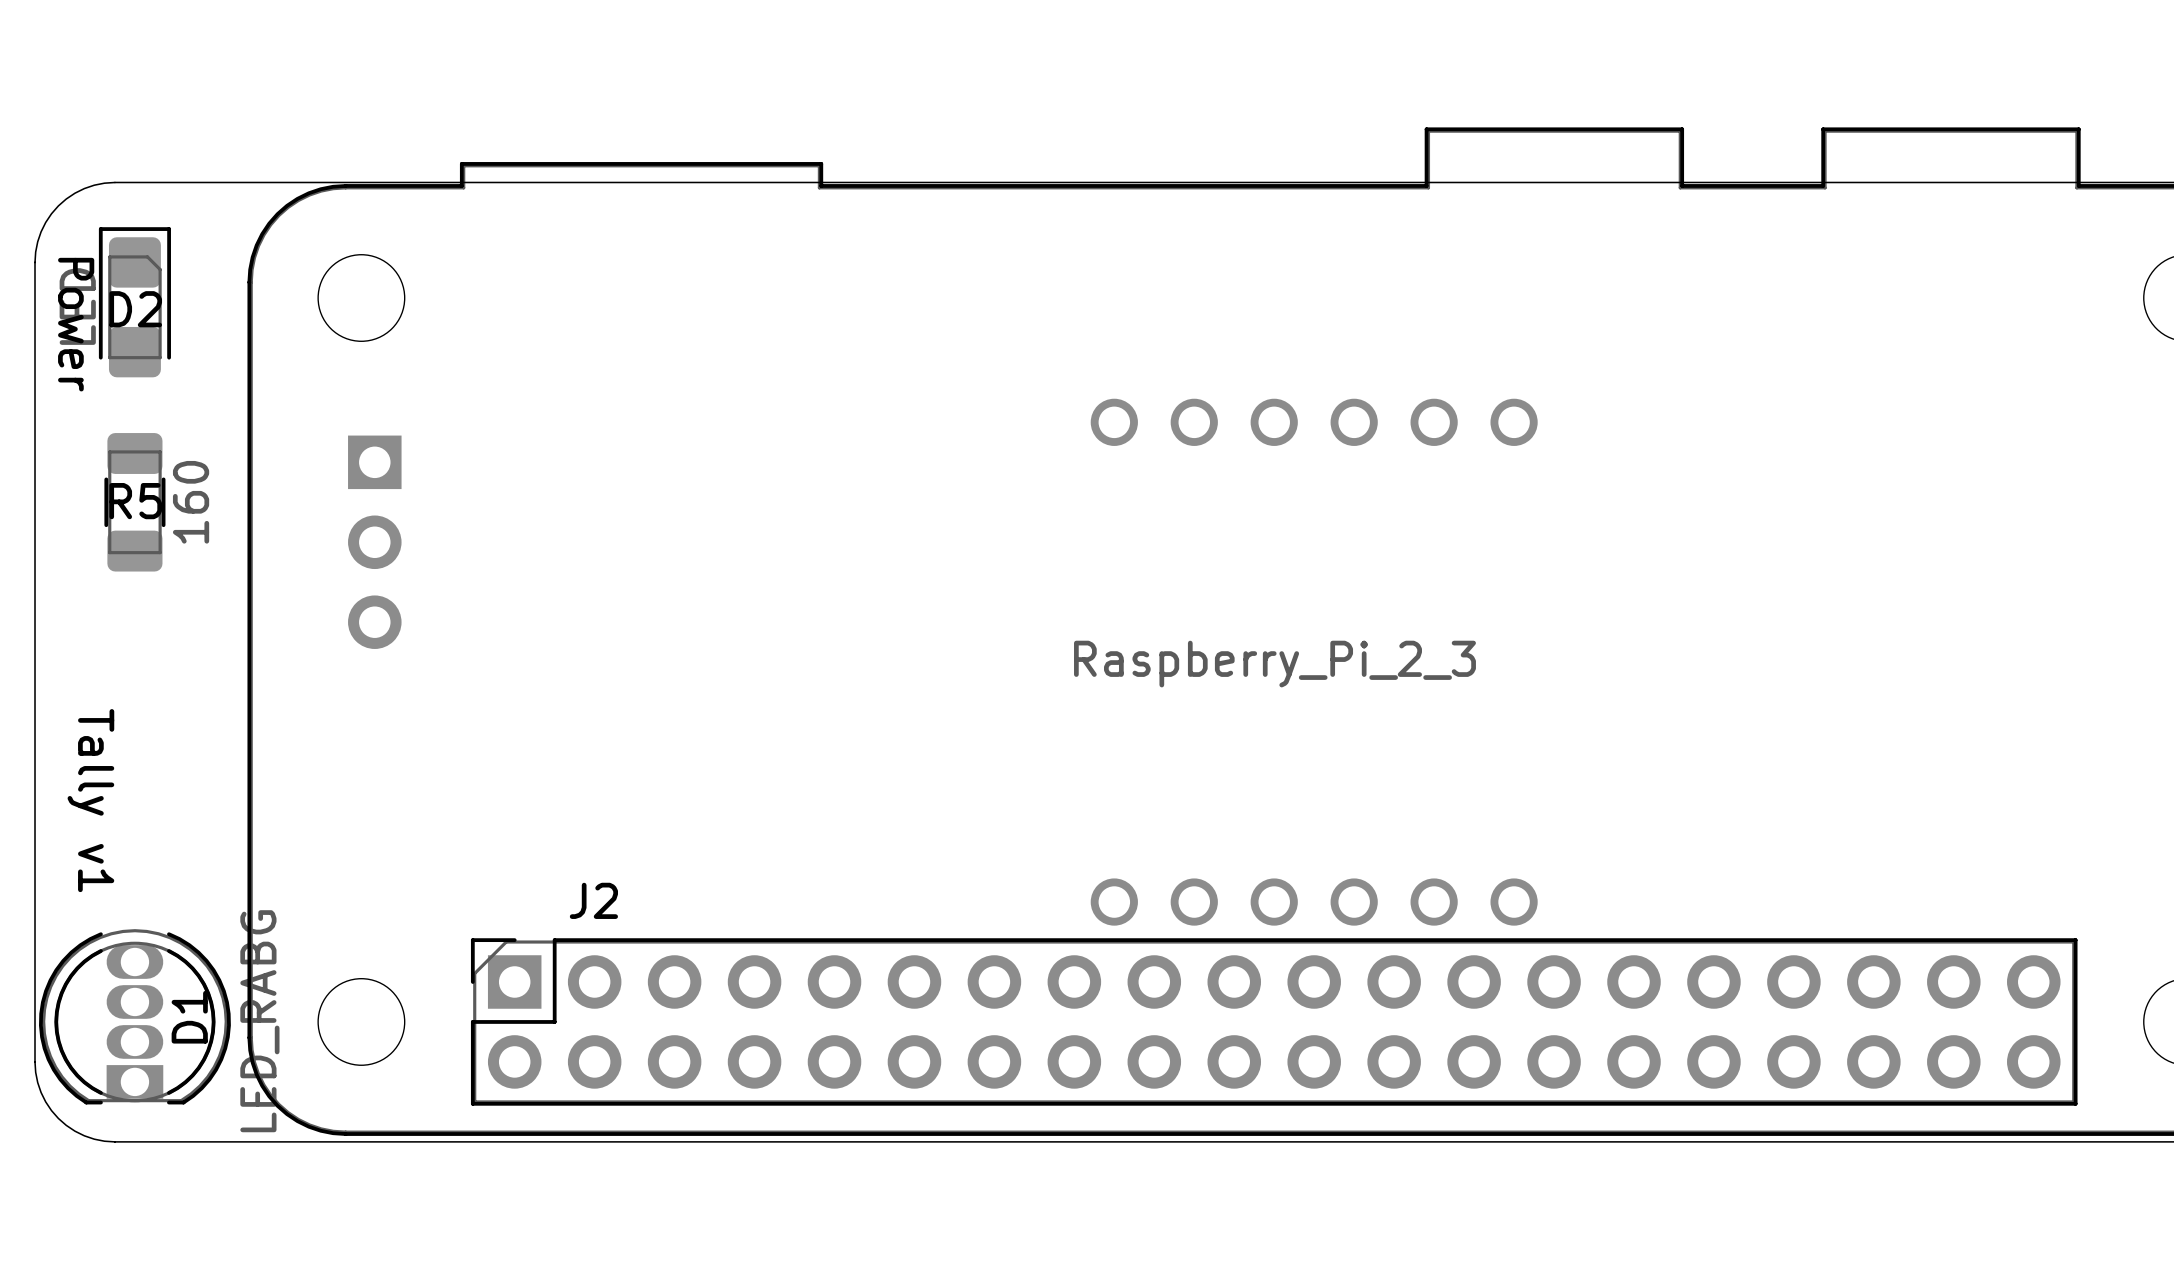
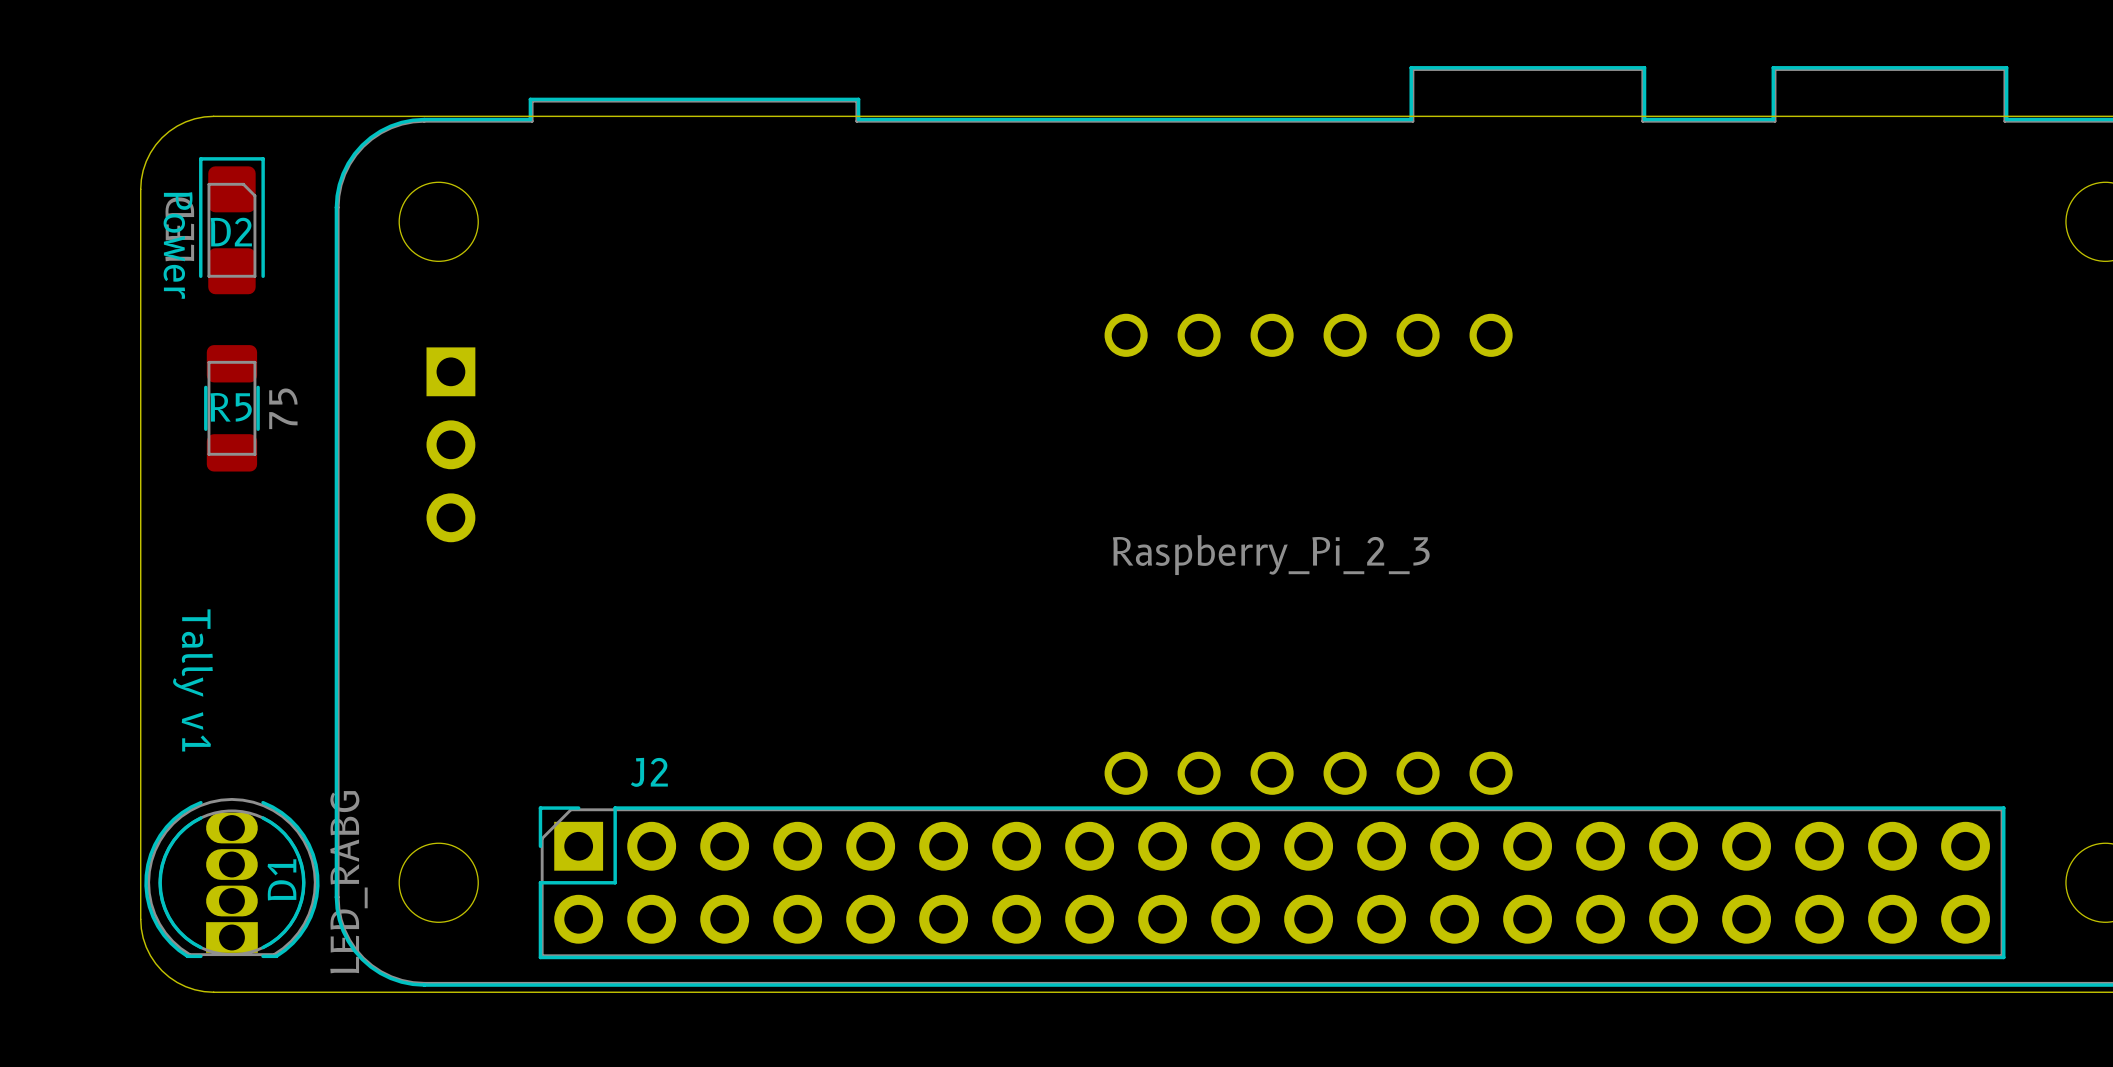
R5 value: 160 (191, 502) -> 75 (283, 408)

